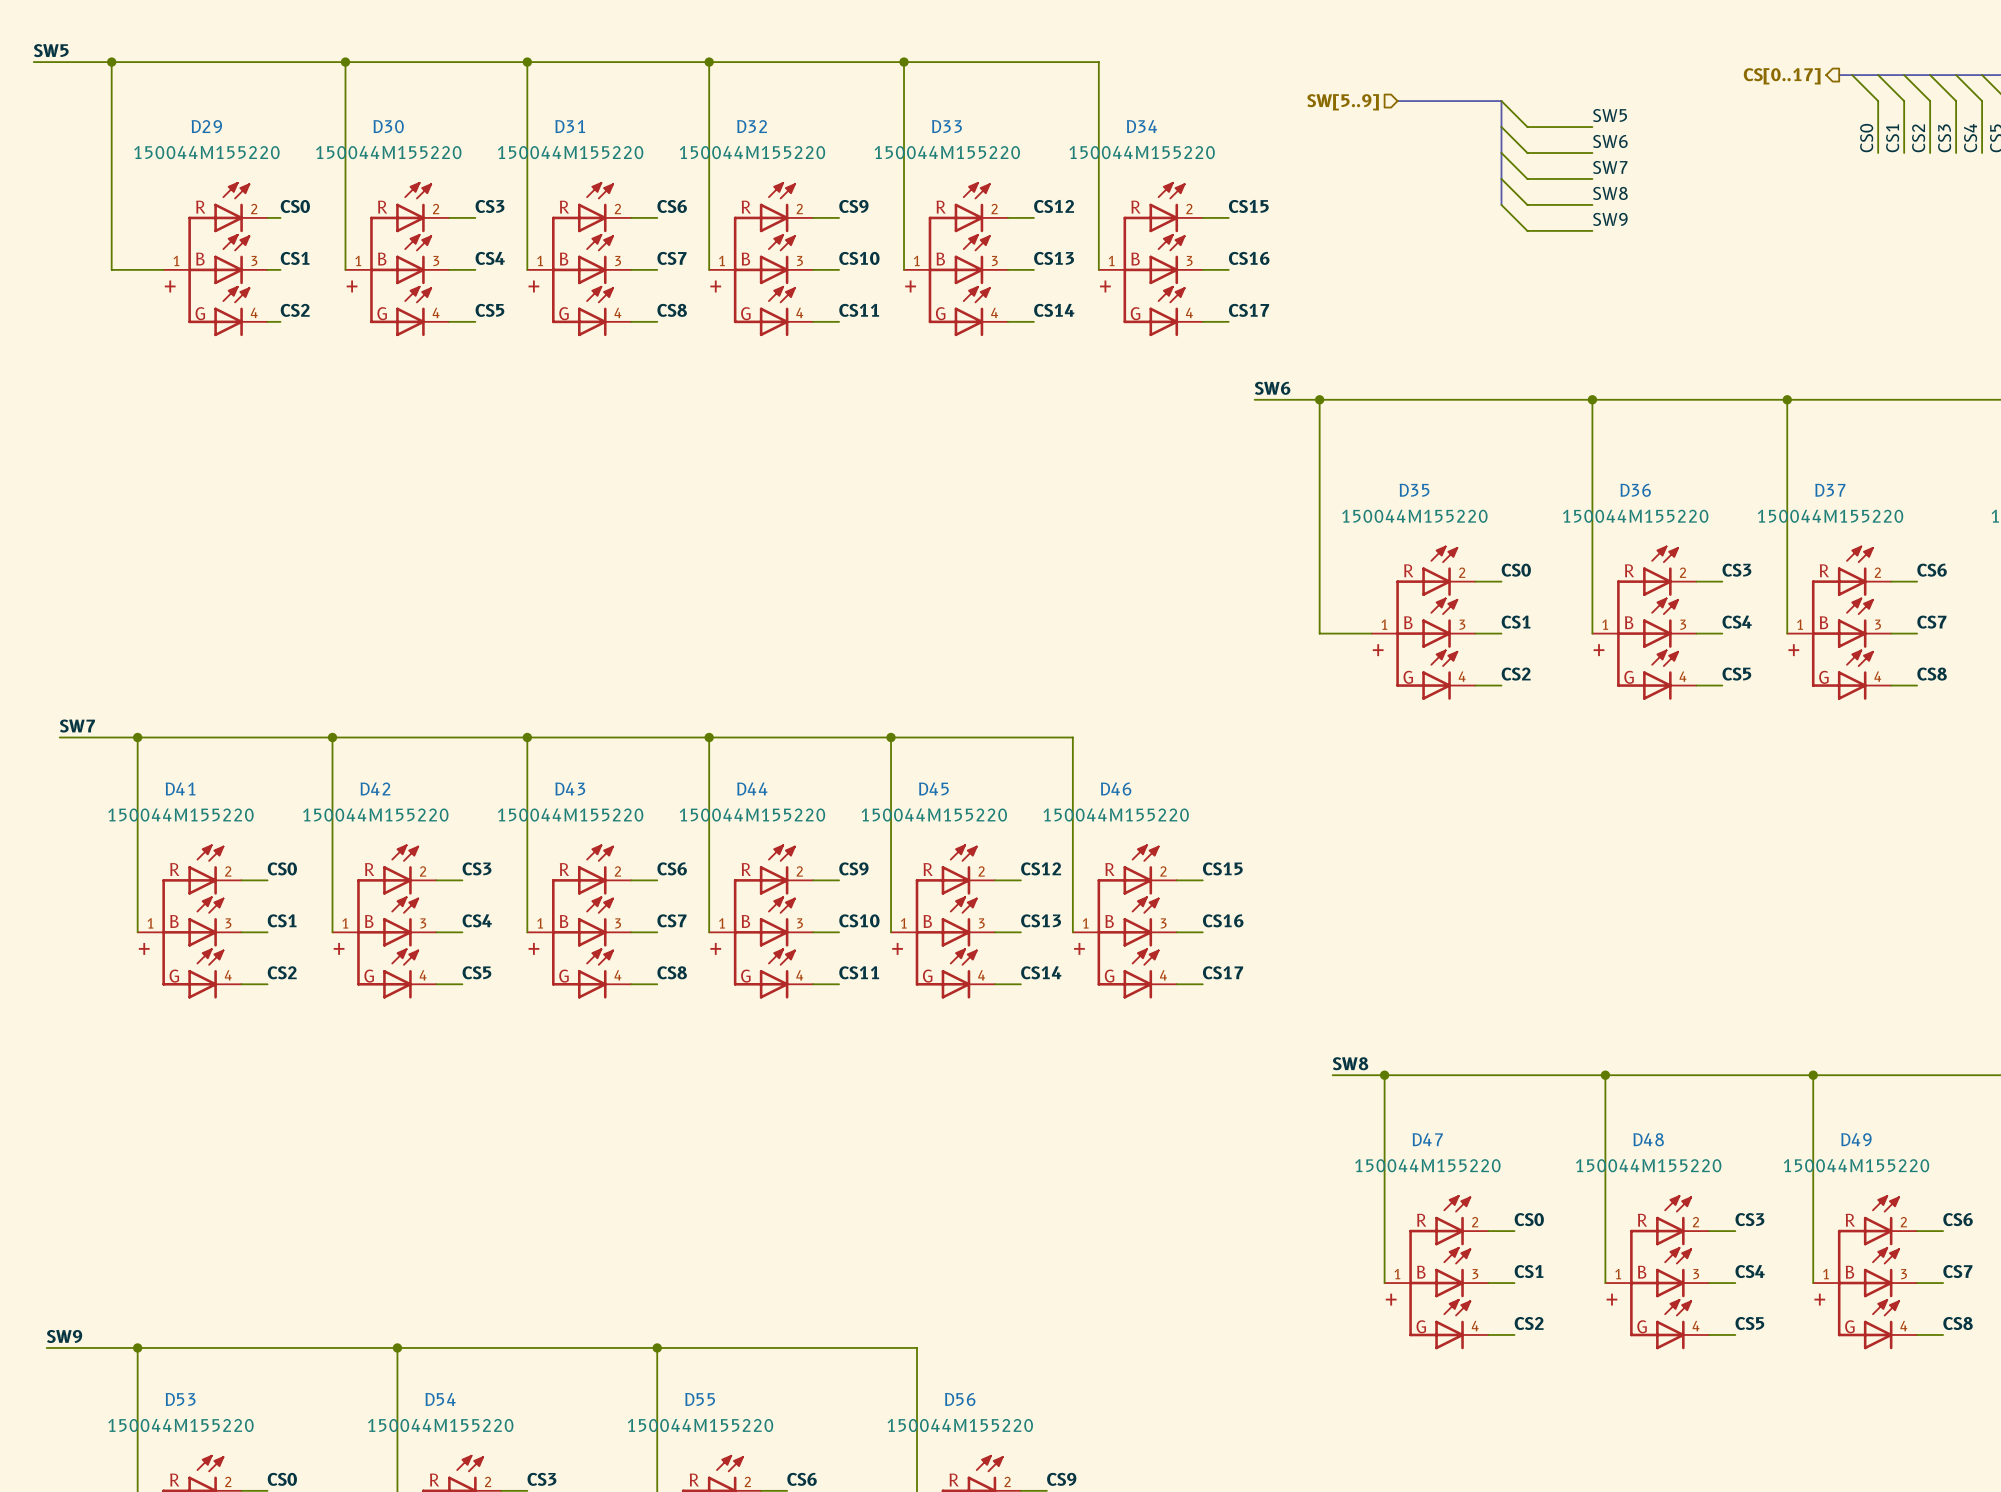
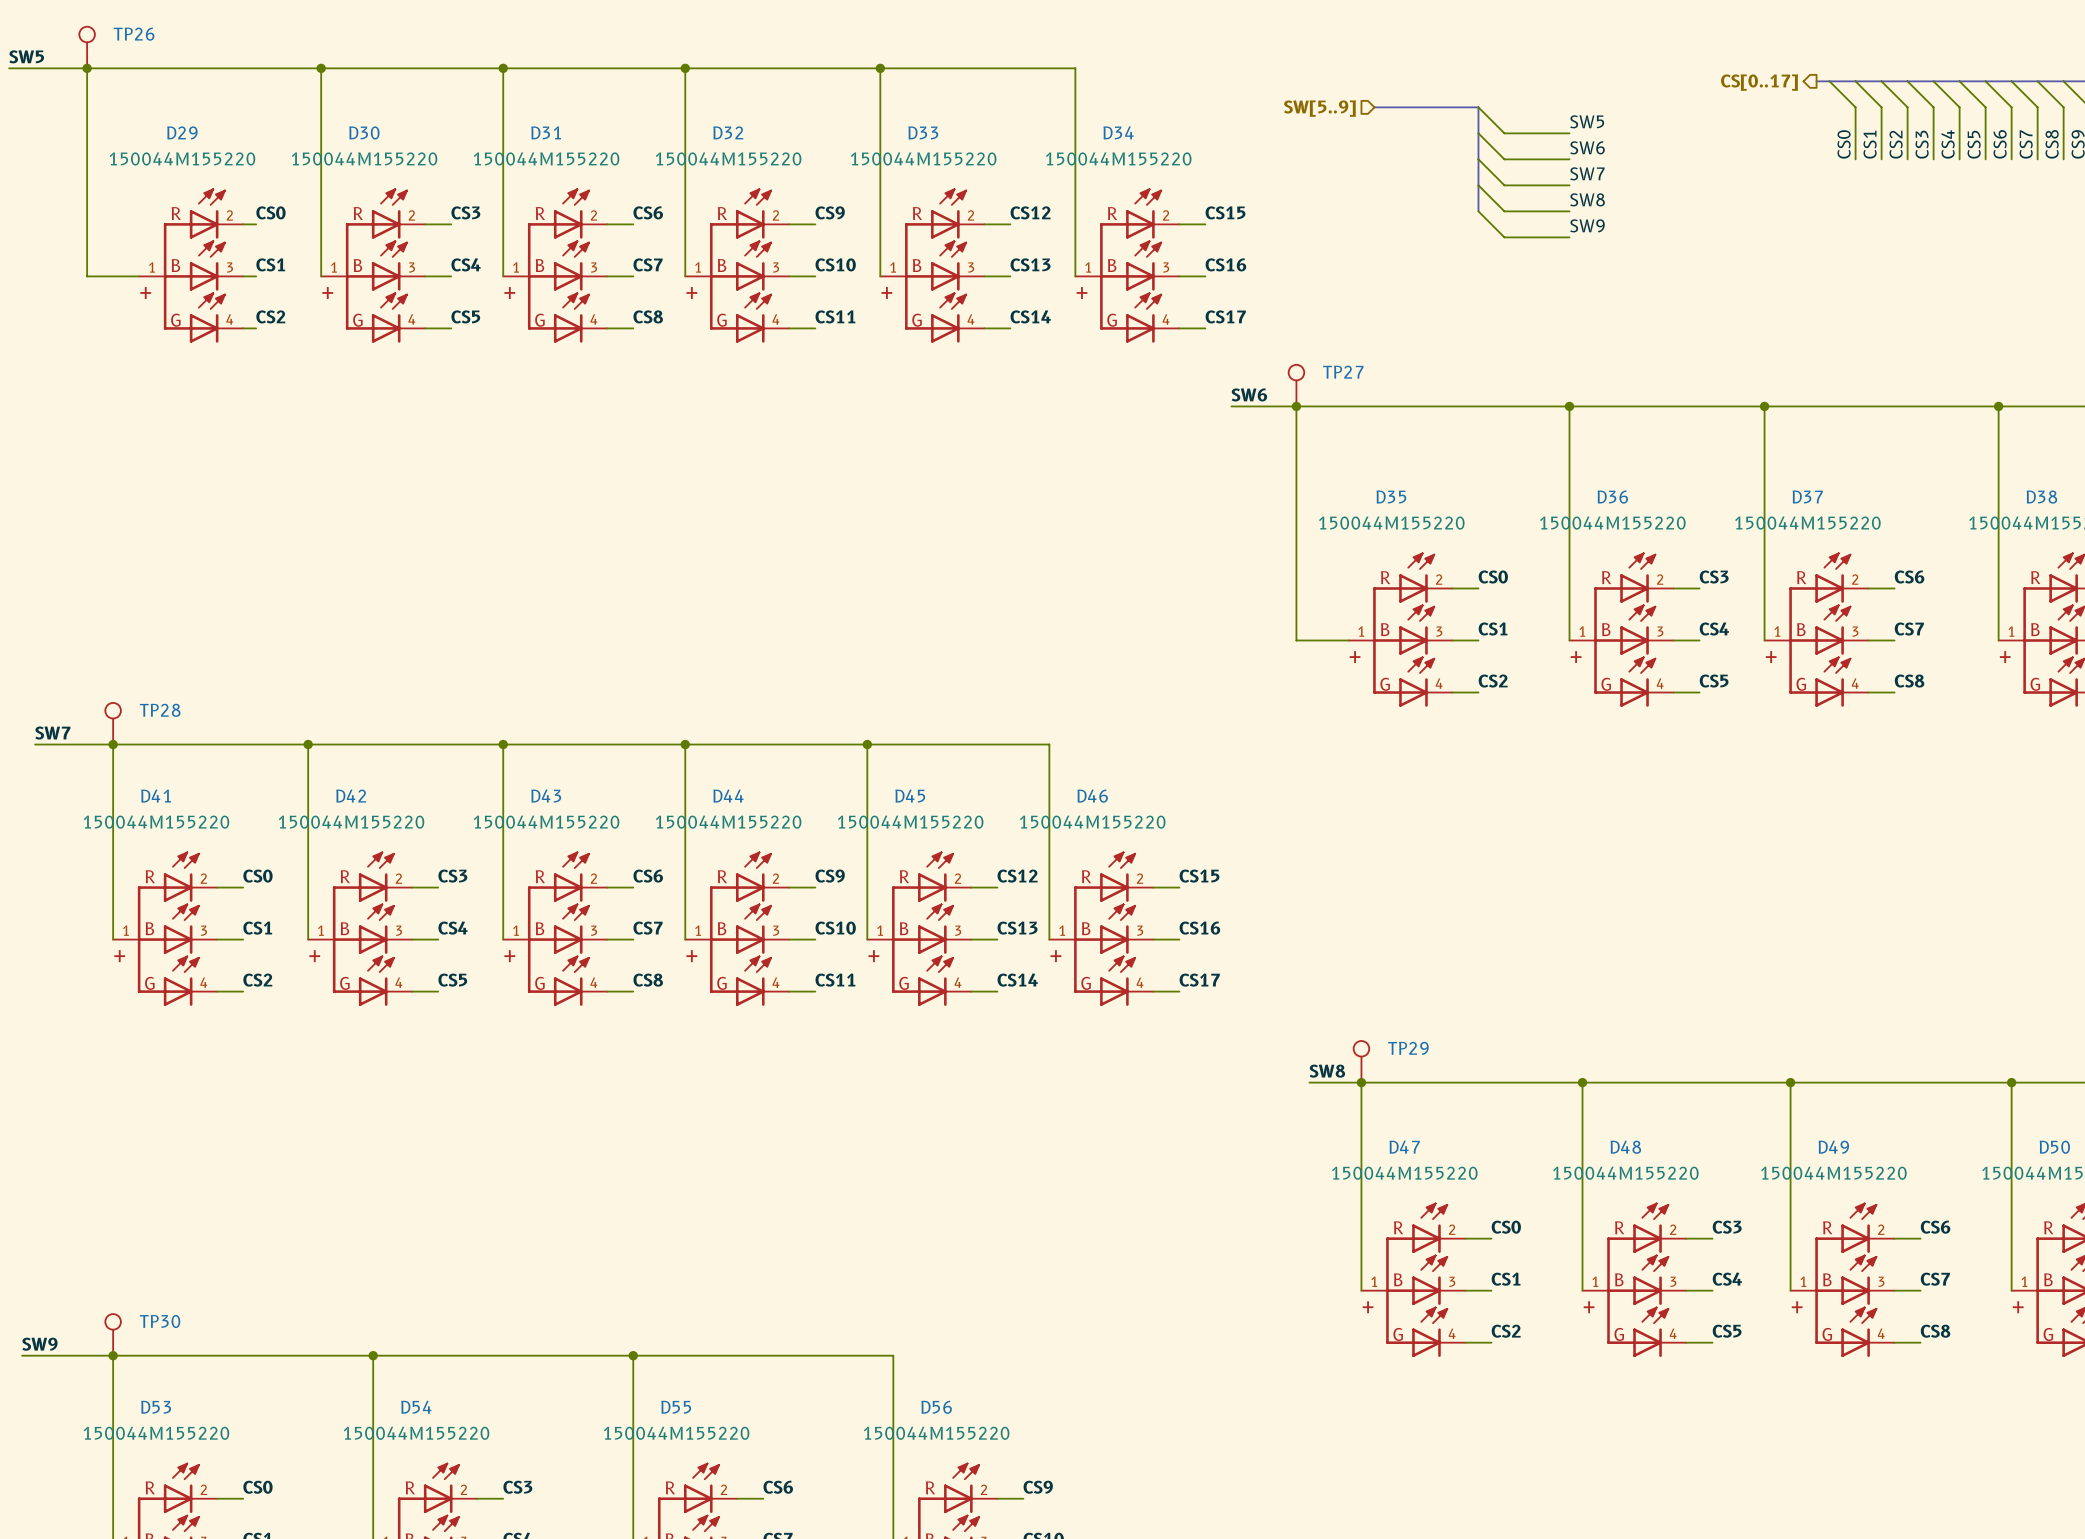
TP26: none -> (87, 47)
TP27: none -> (1296, 385)
TP28: none -> (113, 723)
TP29: none -> (1361, 1061)
TP30: none -> (113, 1334)

